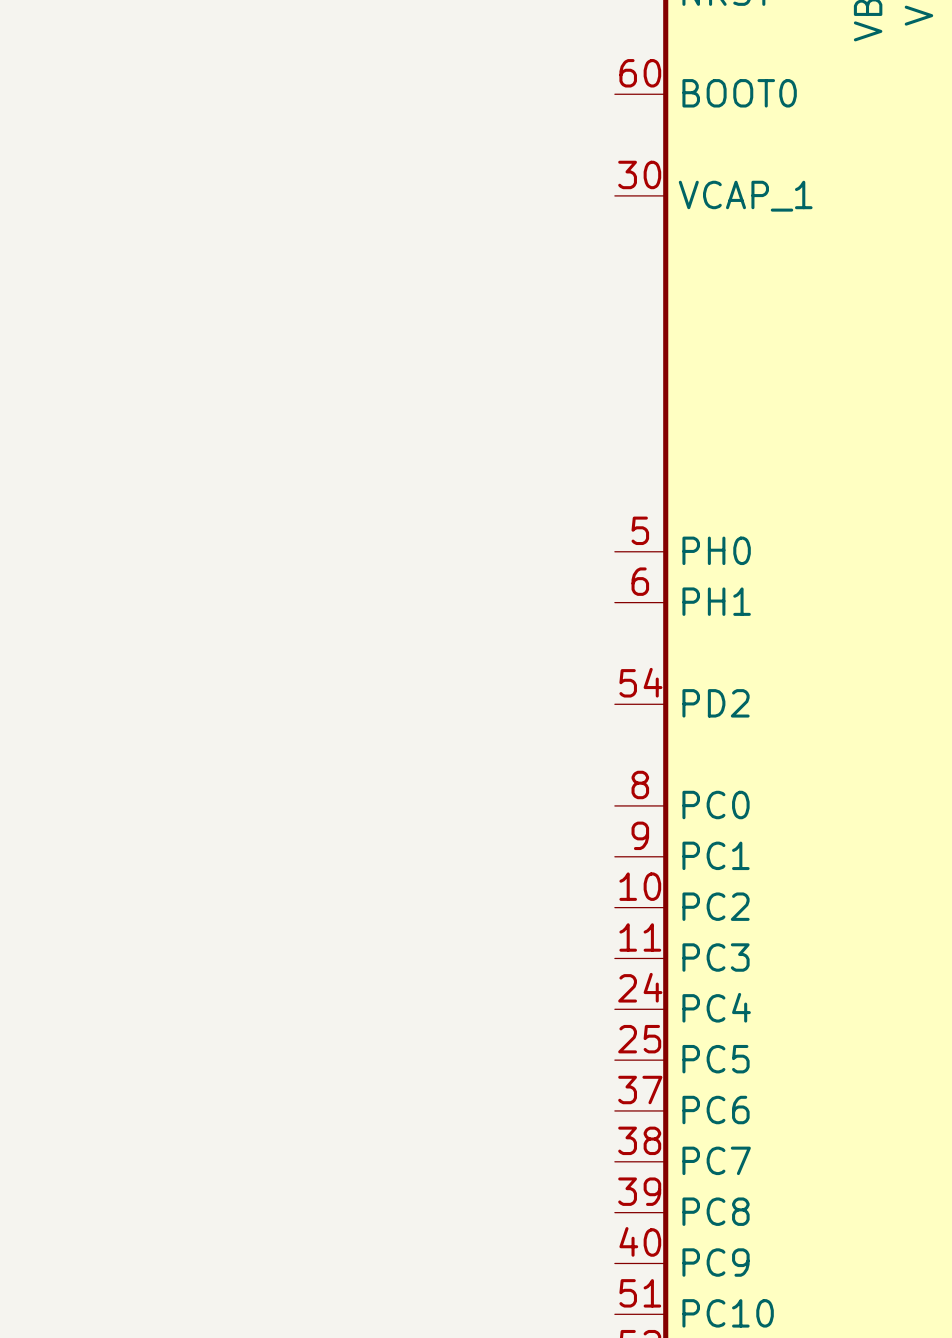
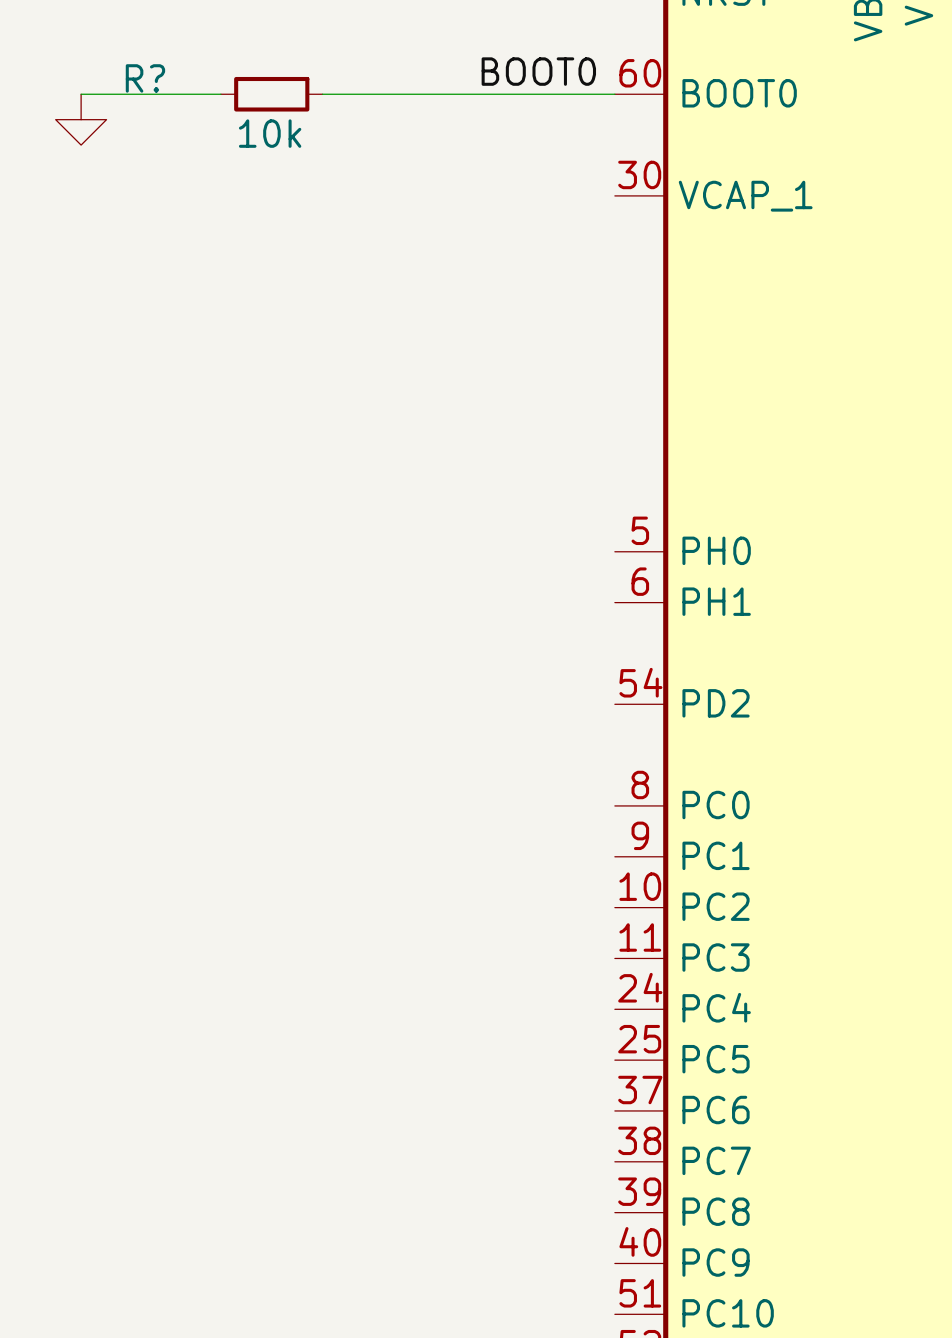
label: none -> BOOT0 (538, 71)
wire: none -> (81, 94) (220, 94)
R?: none -> 10k (271, 94)
wire: none -> (322, 94) (614, 94)
power symbol: none -> (81, 119)

